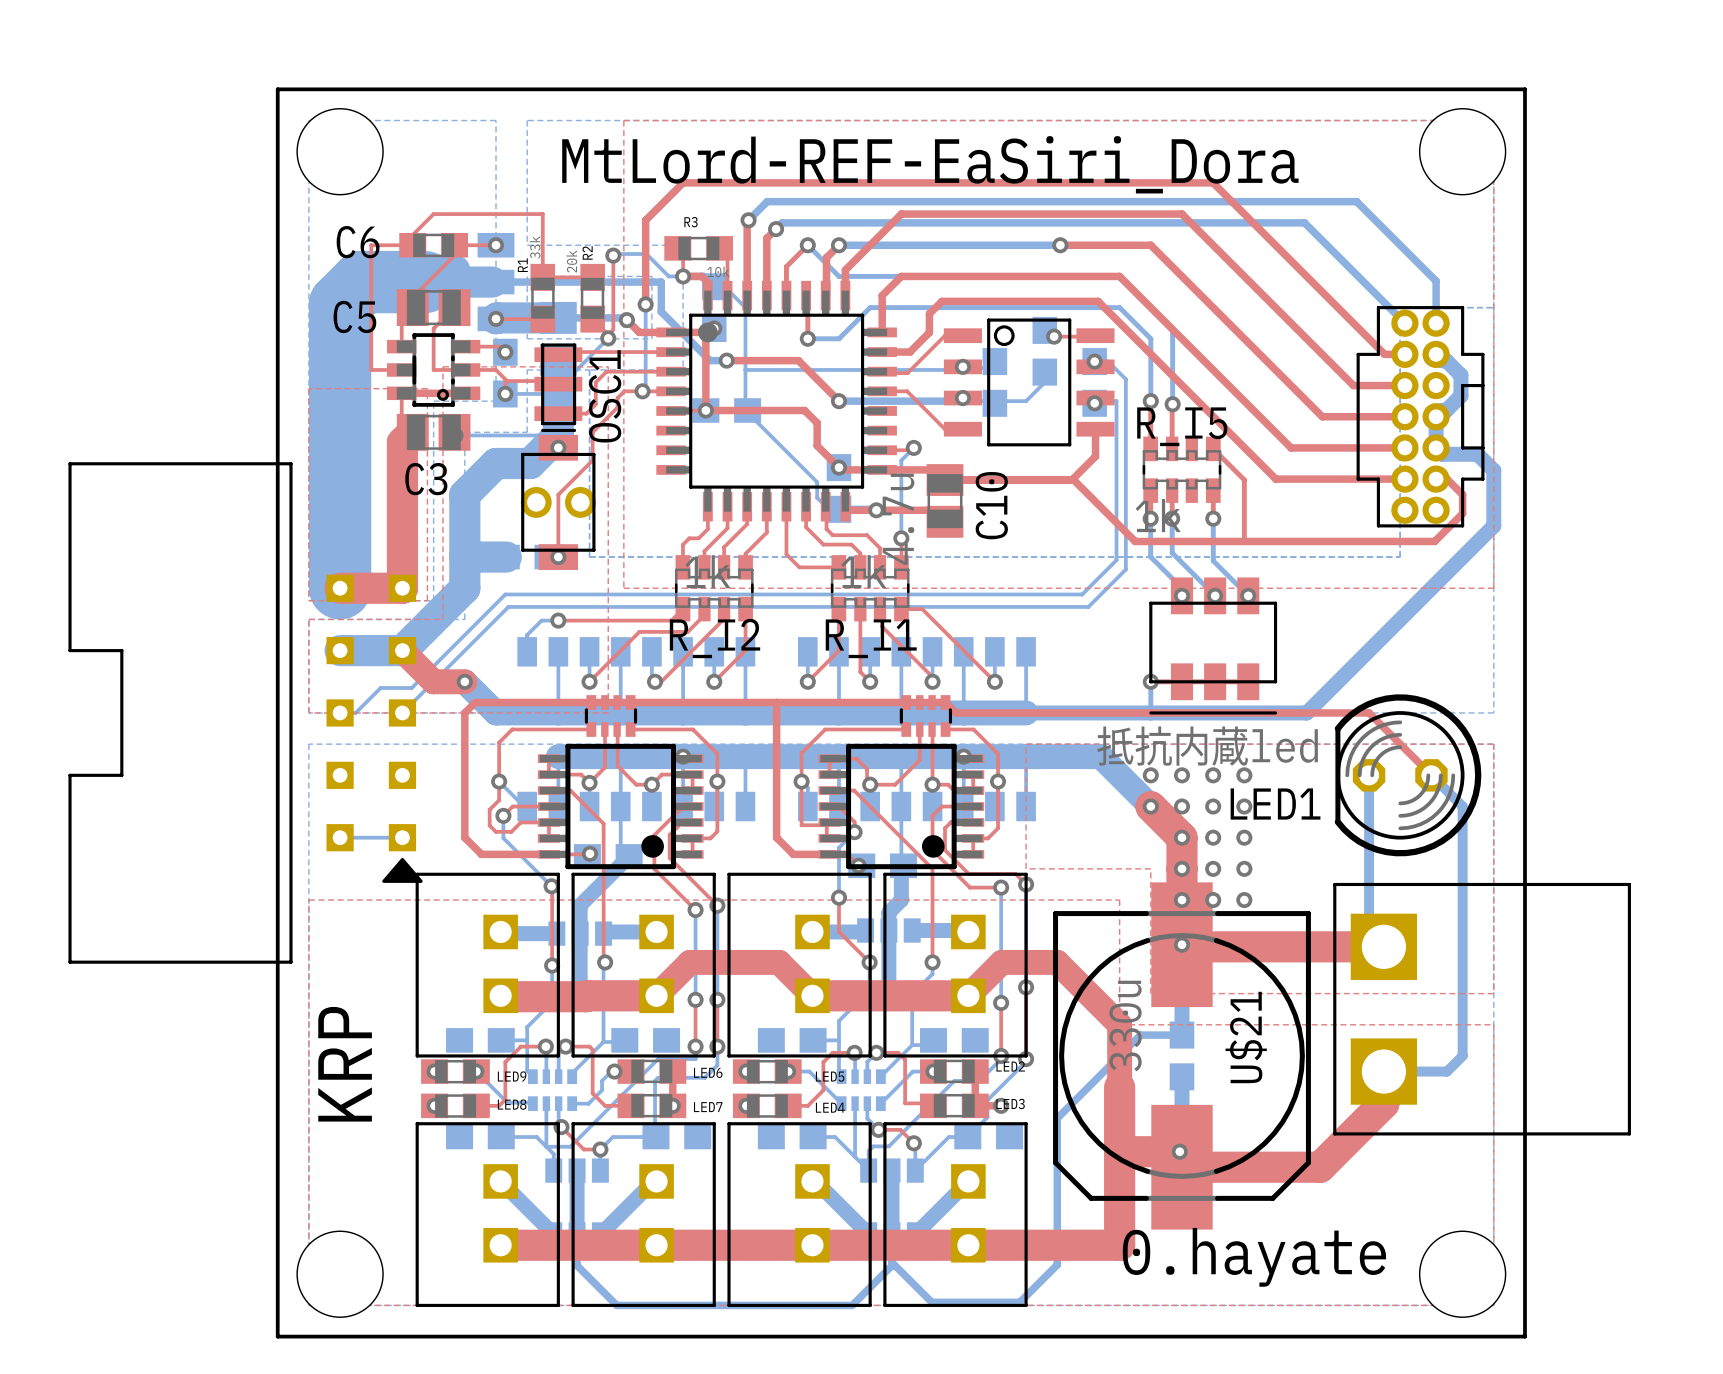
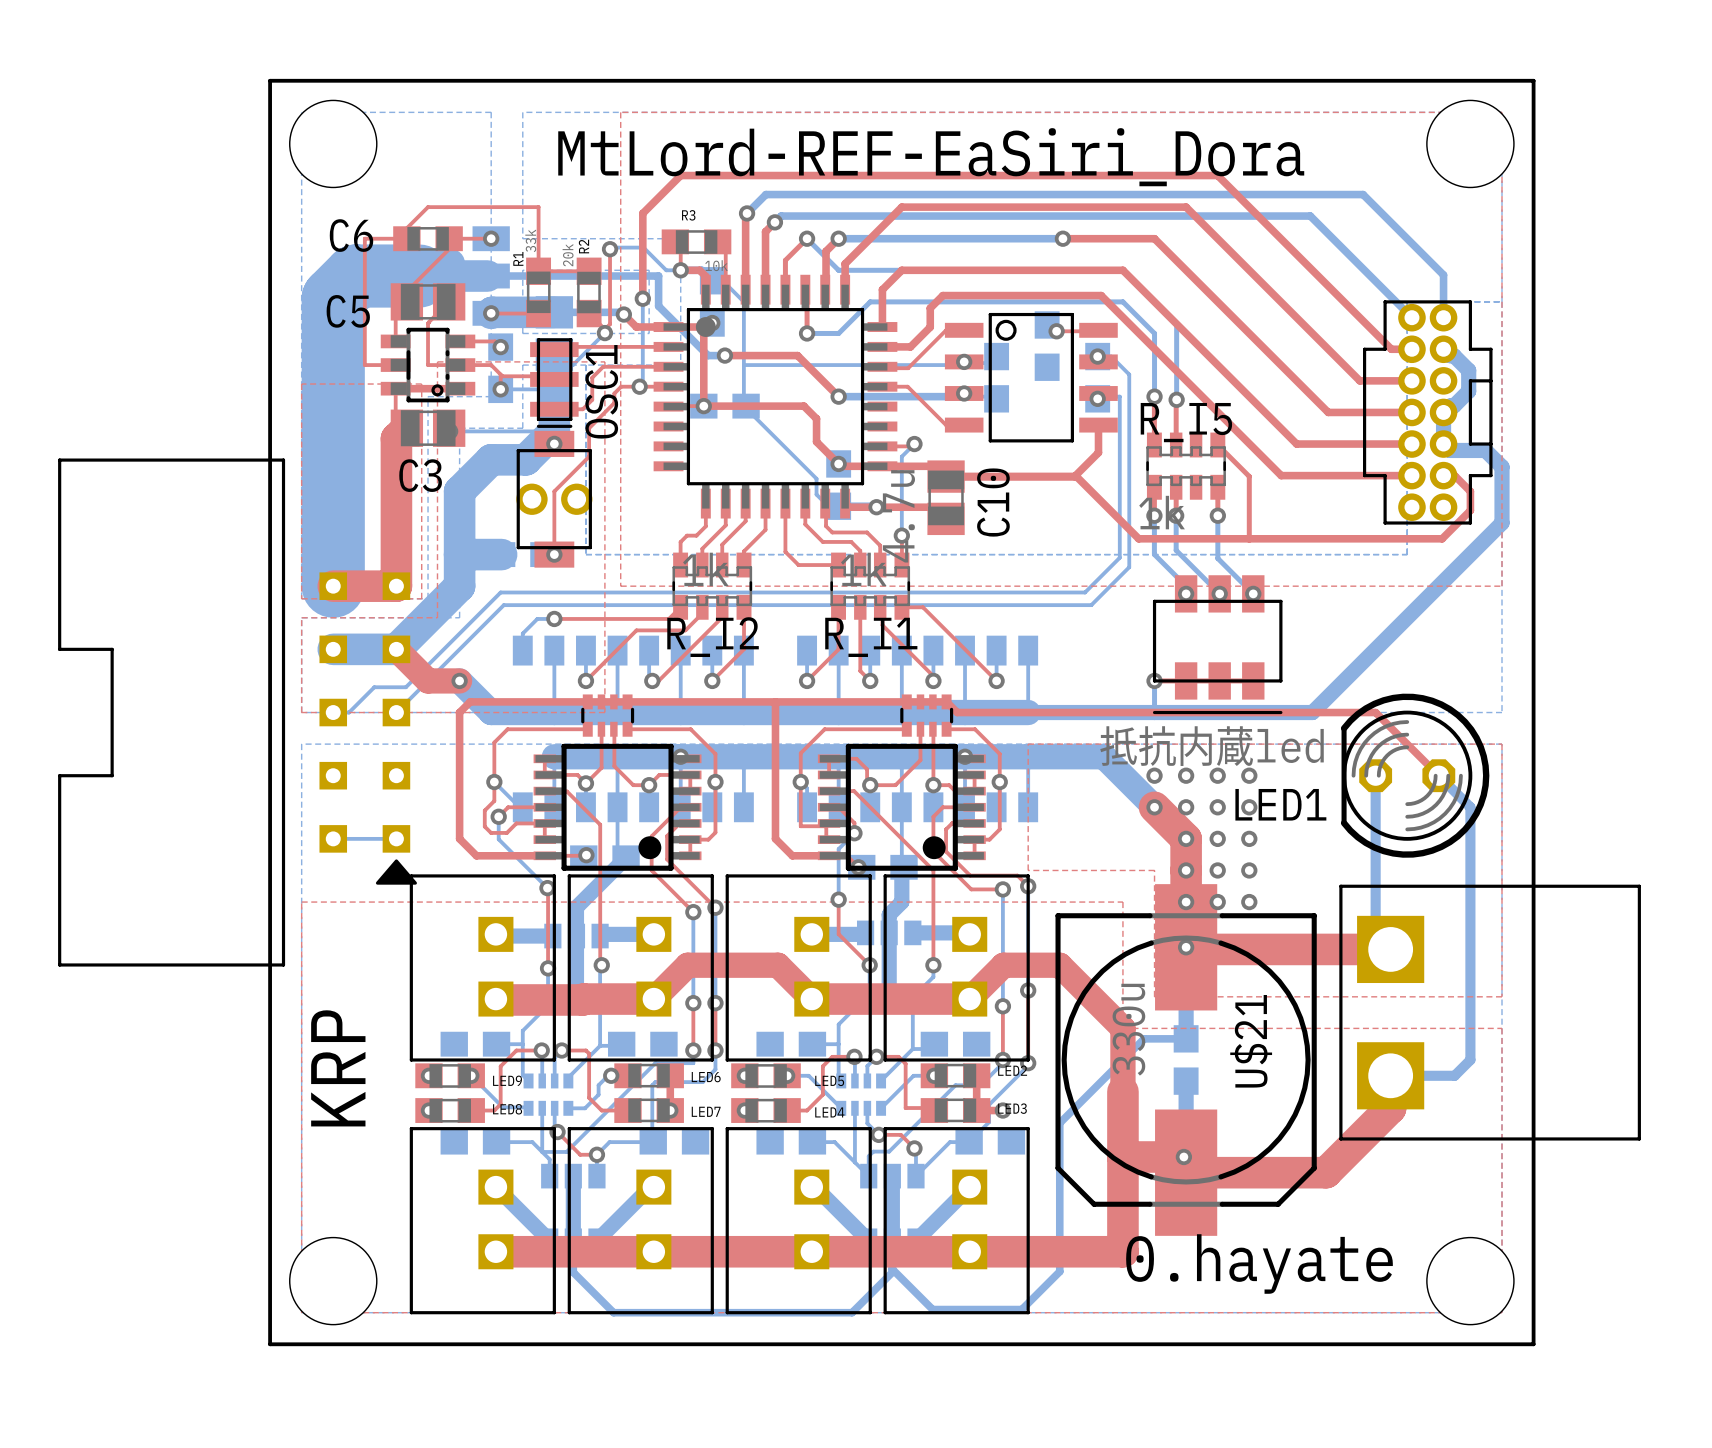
bottom track: (1044, 372) (1044, 382) (1026, 401) (994, 401) -> none

